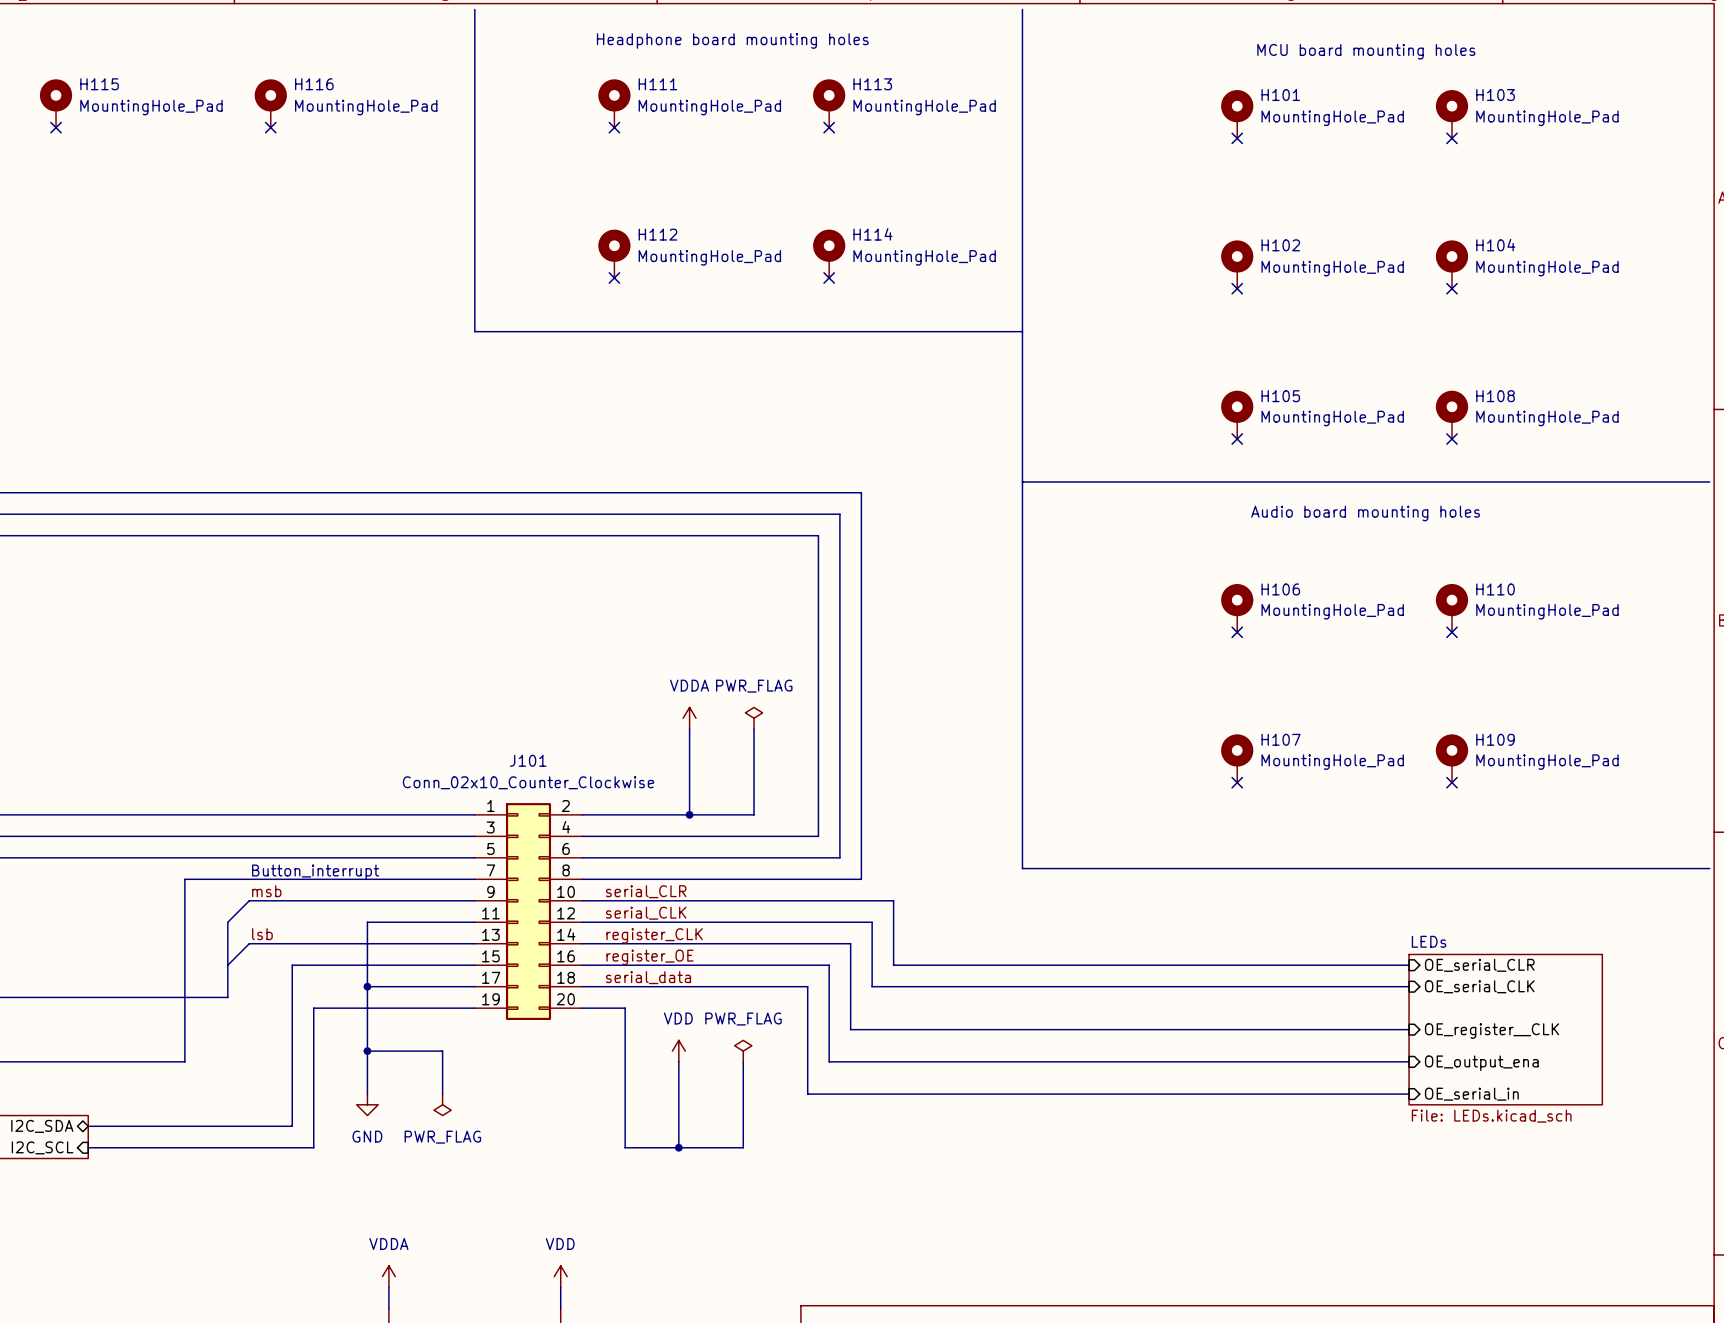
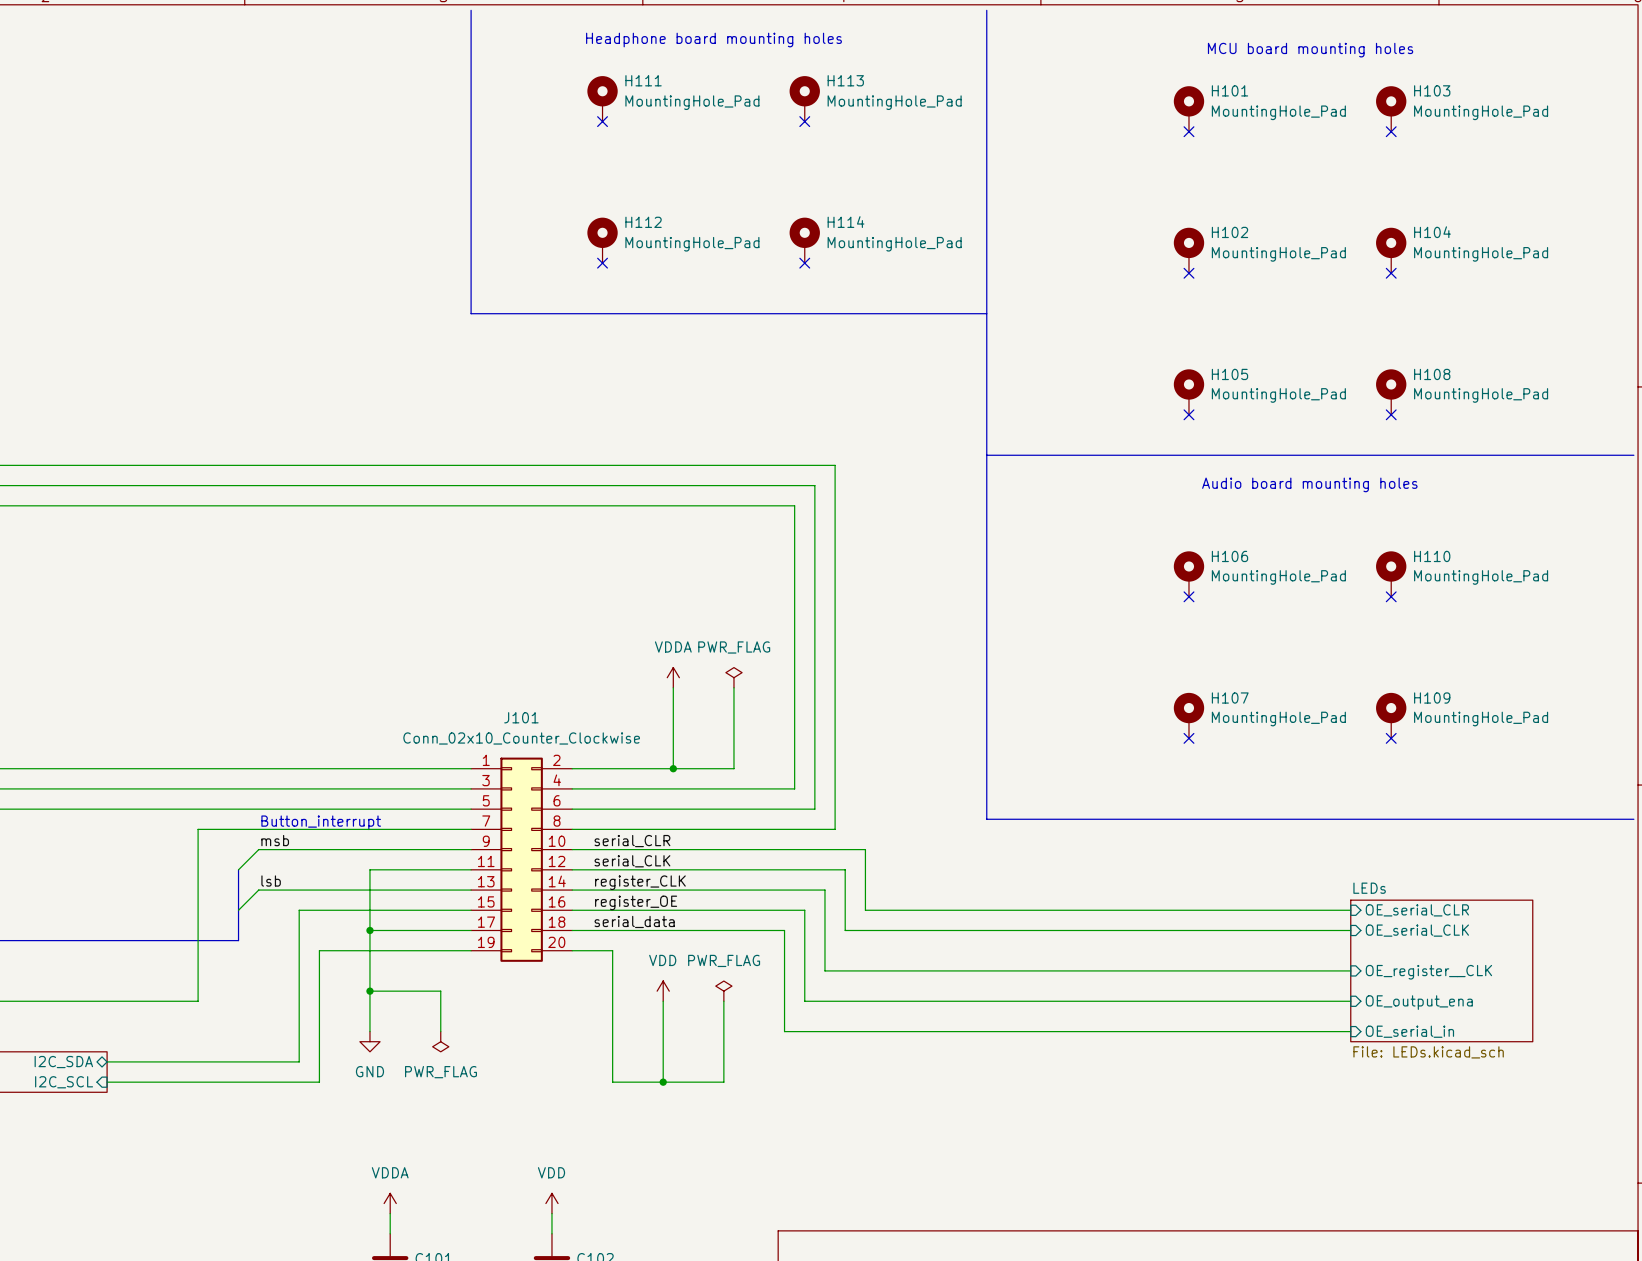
H115: MountingHole_Pad (56, 103) -> none
H116: MountingHole_Pad (270, 103) -> none
no-connect mark: (56, 127) -> none
no-connect mark: (270, 127) -> none

